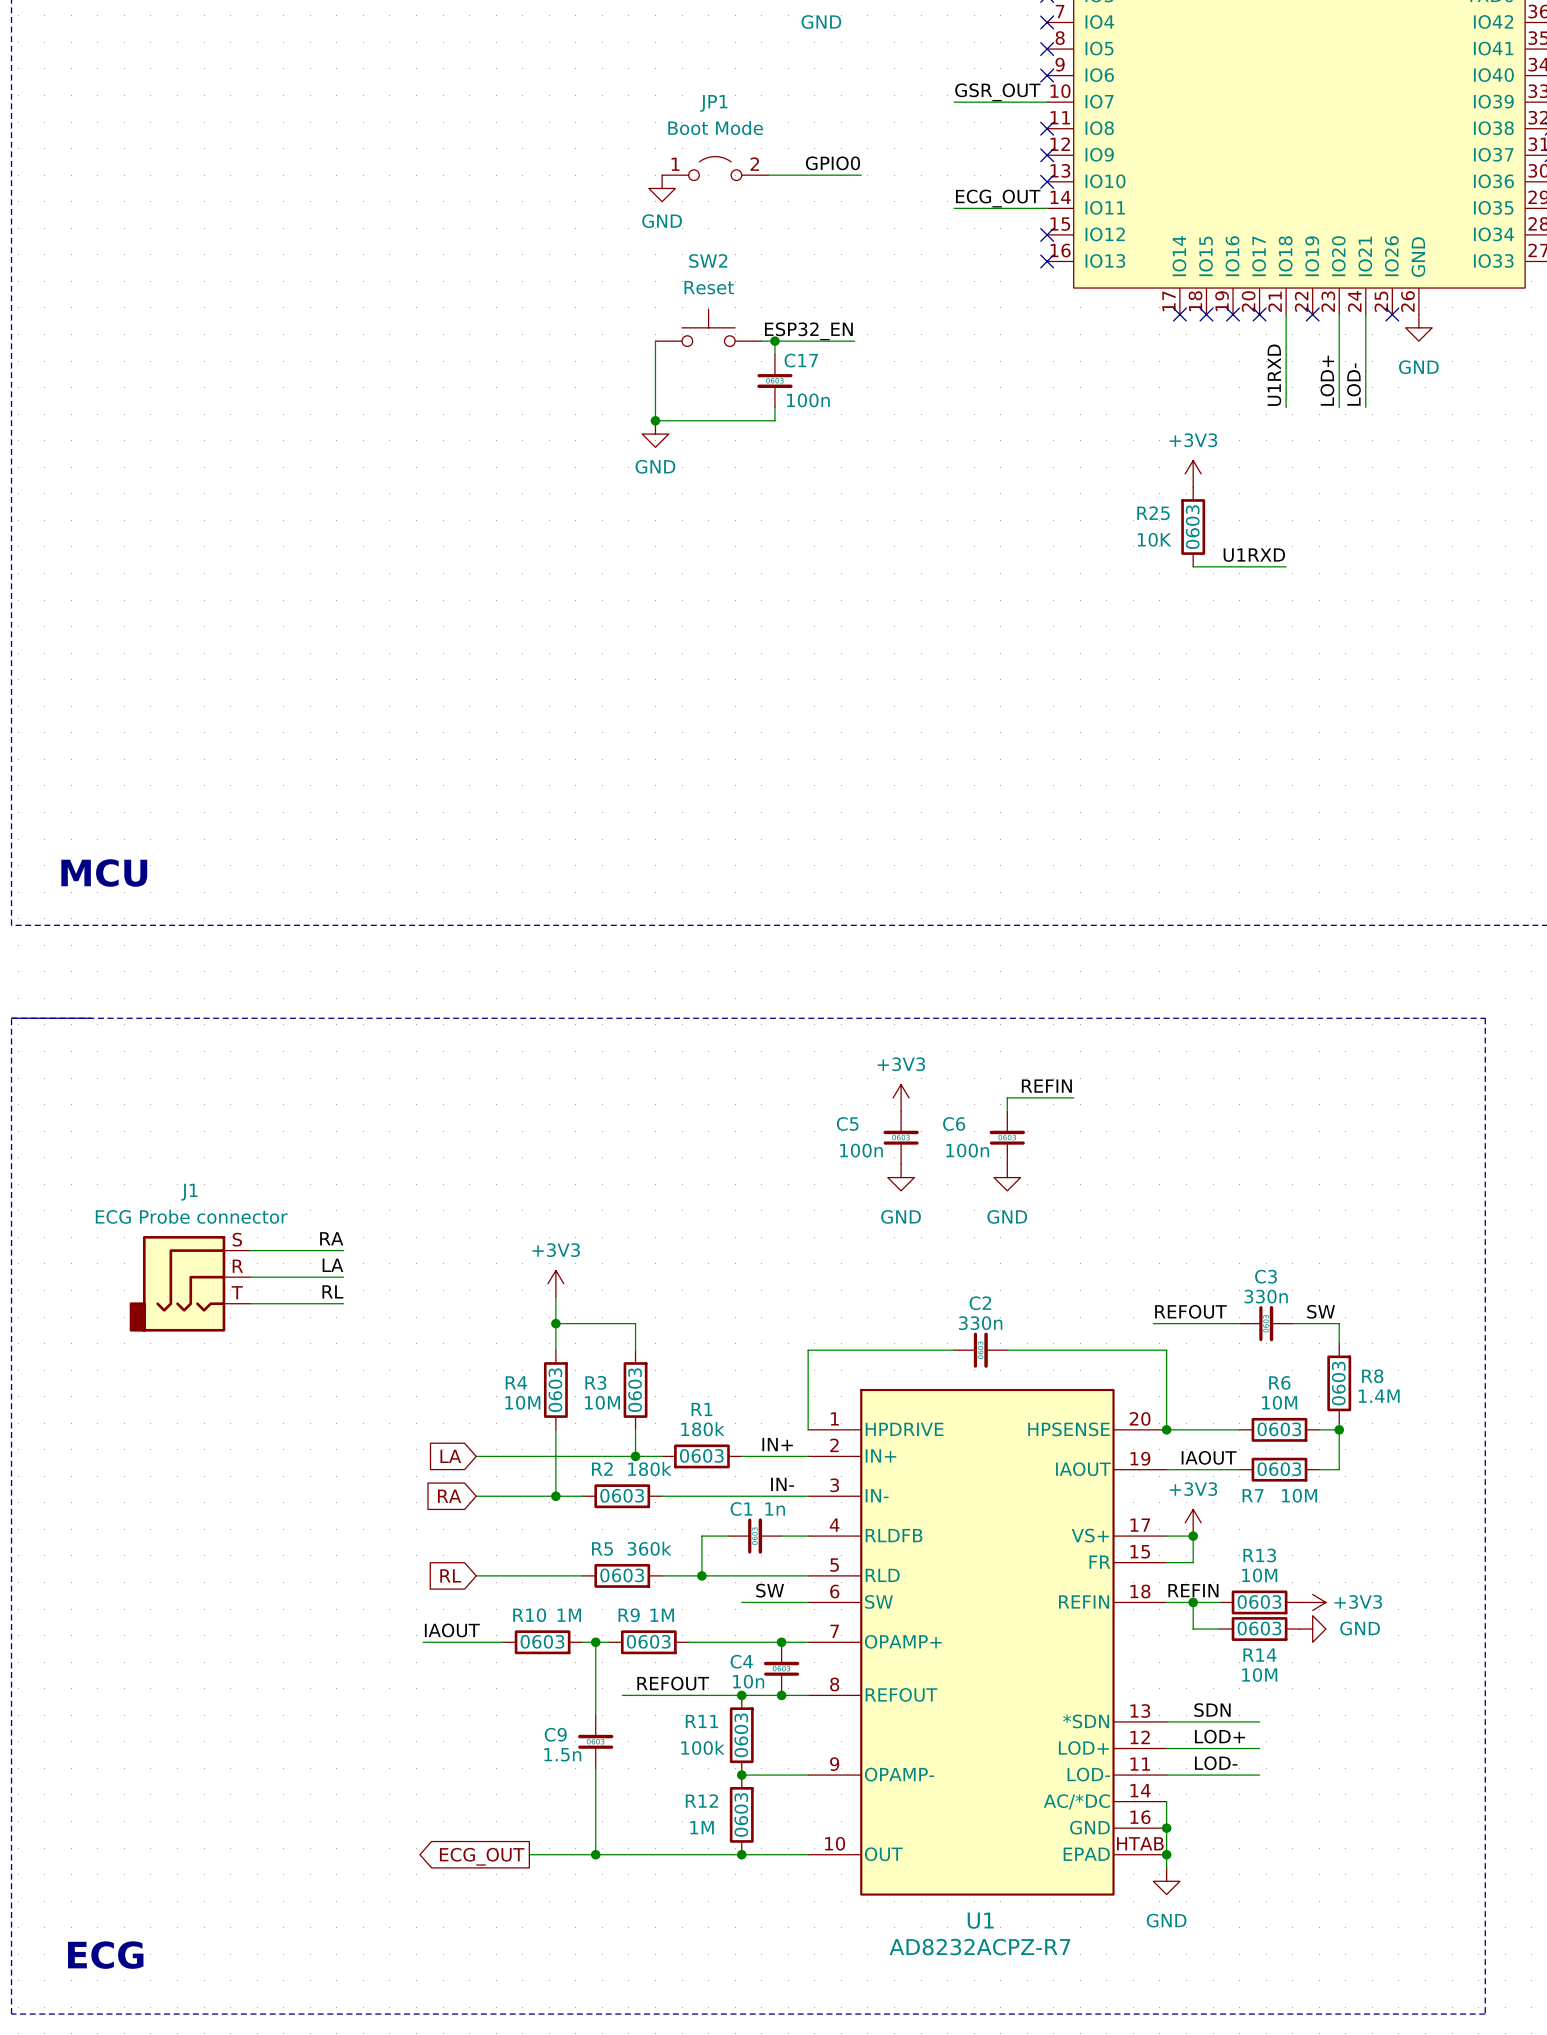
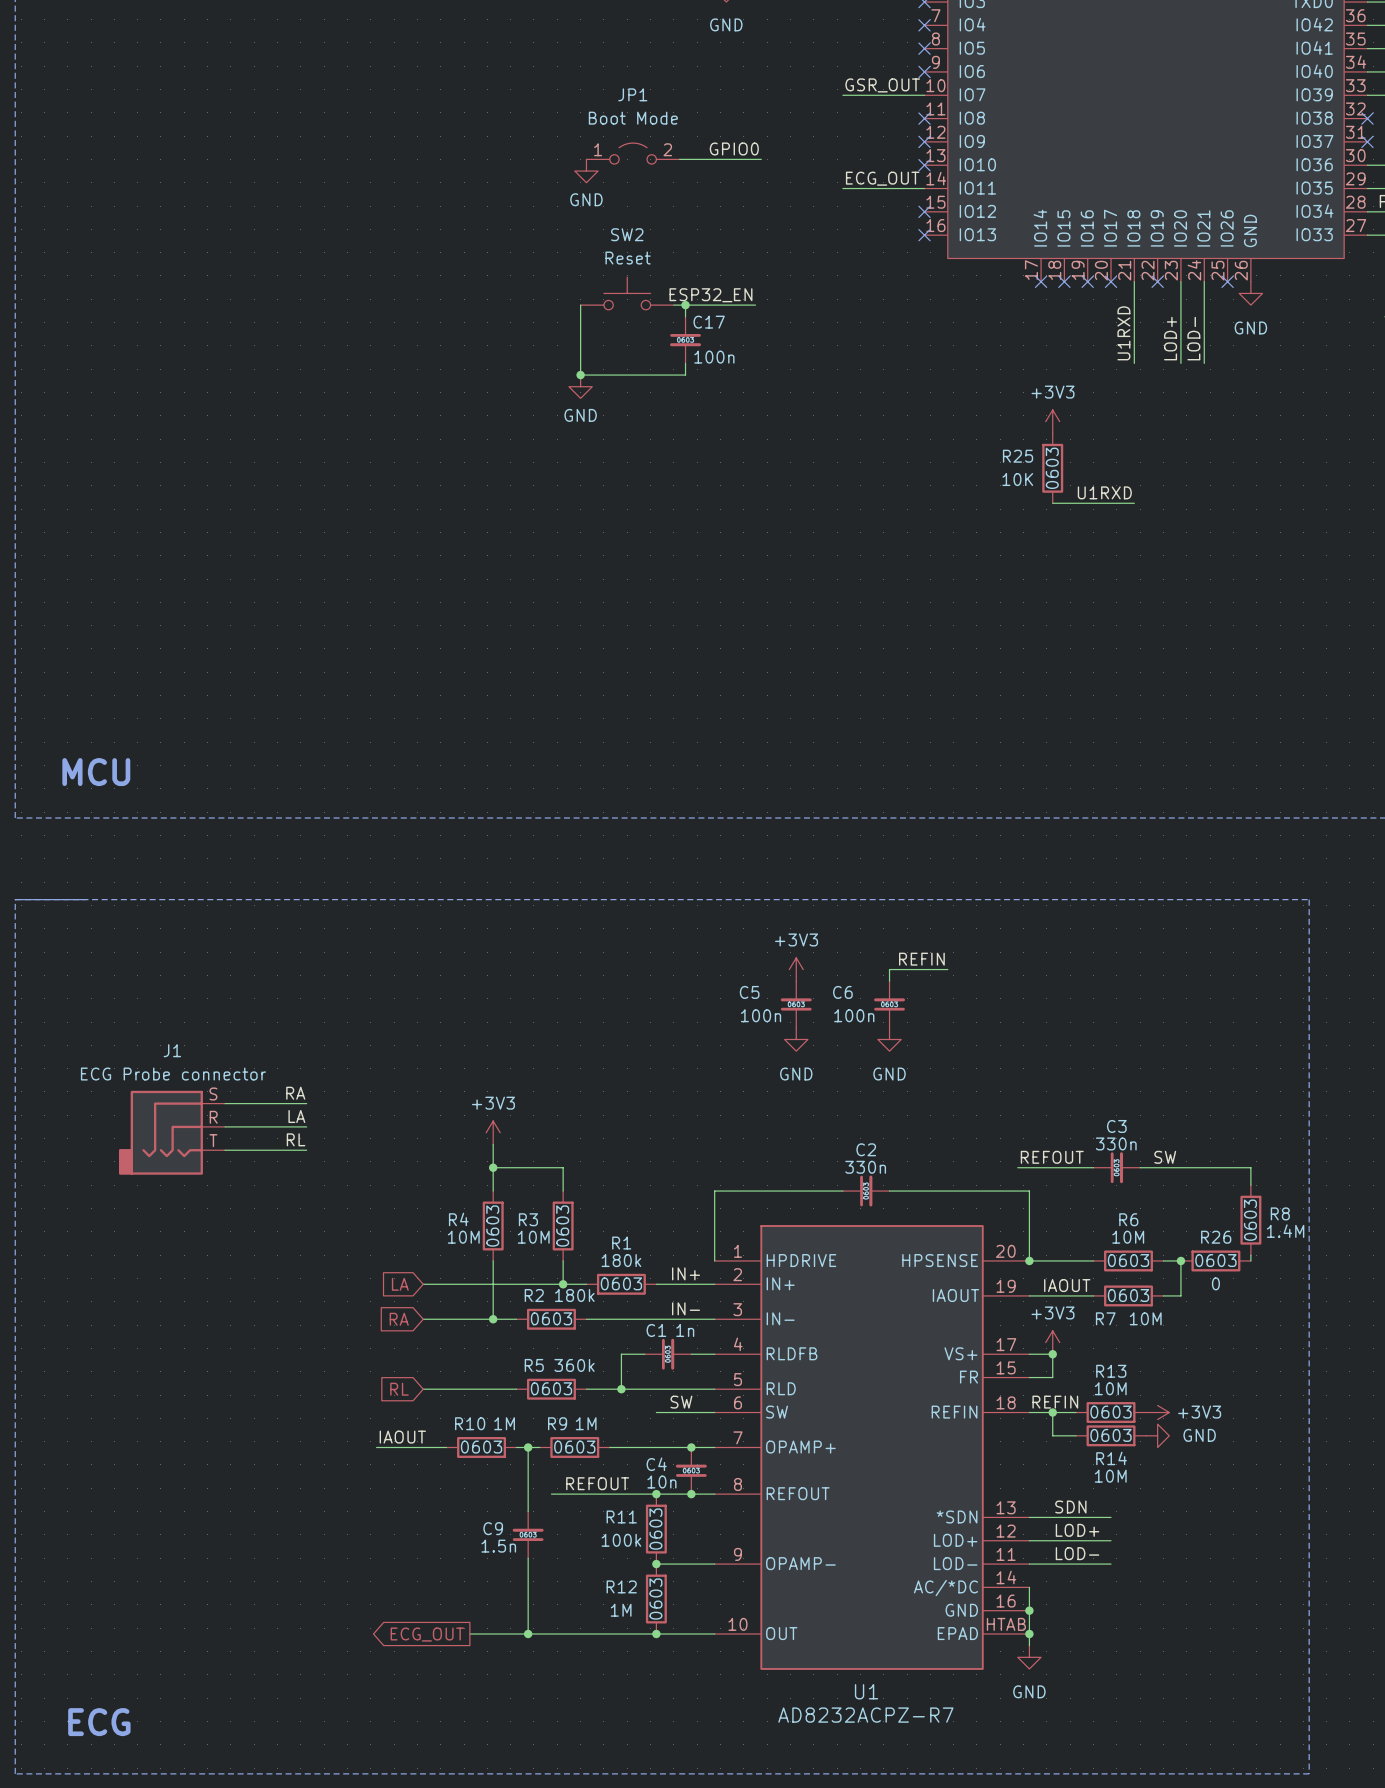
wire: (1339, 1323) (1339, 1343) -> (1180, 1167) (1250, 1167) (1250, 1185)
R8 position: (1339, 1383) -> (1250, 1220)
R26: none -> 0 (1215, 1260)

